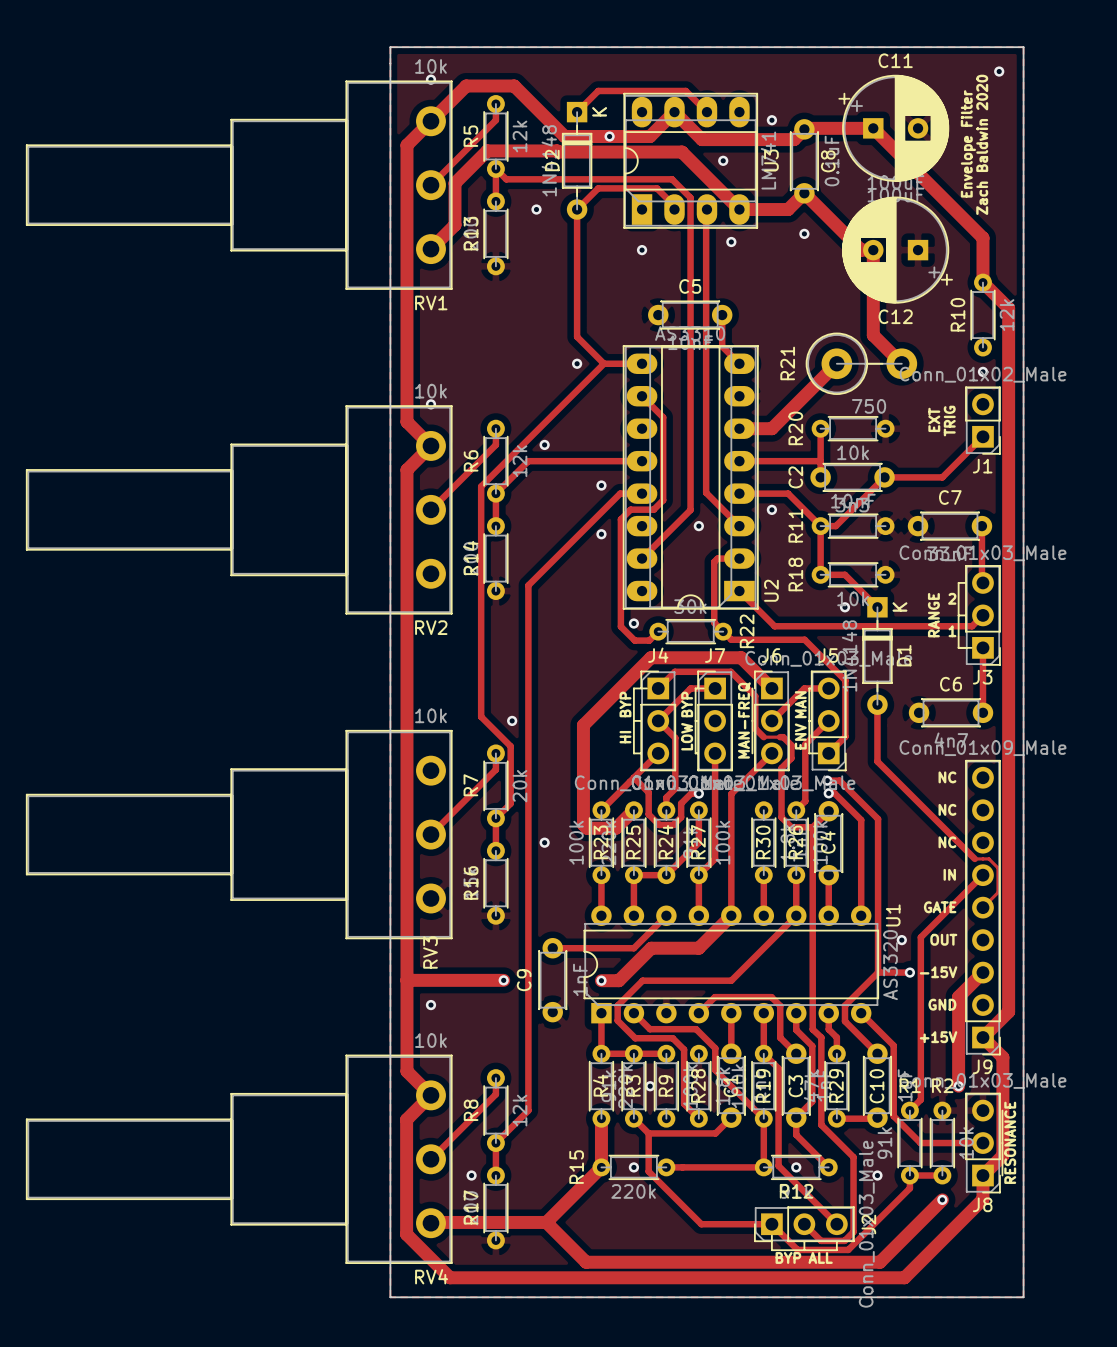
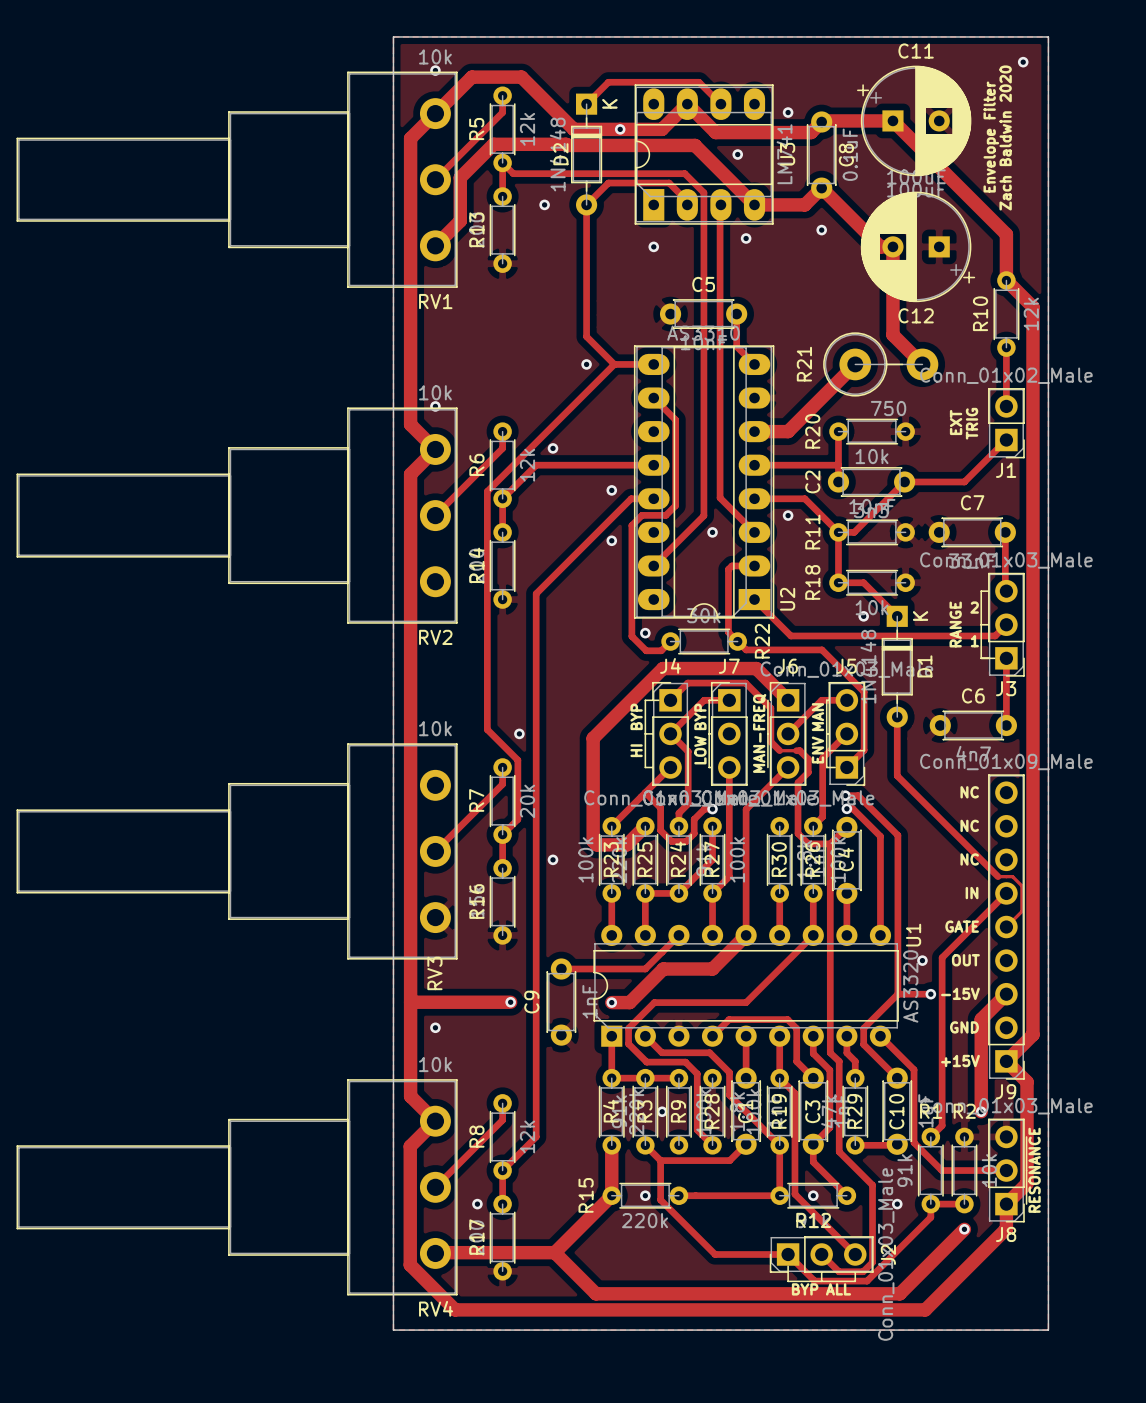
track: none -> (1006, 347) (1006, 406)
via: (982, 371) -> none

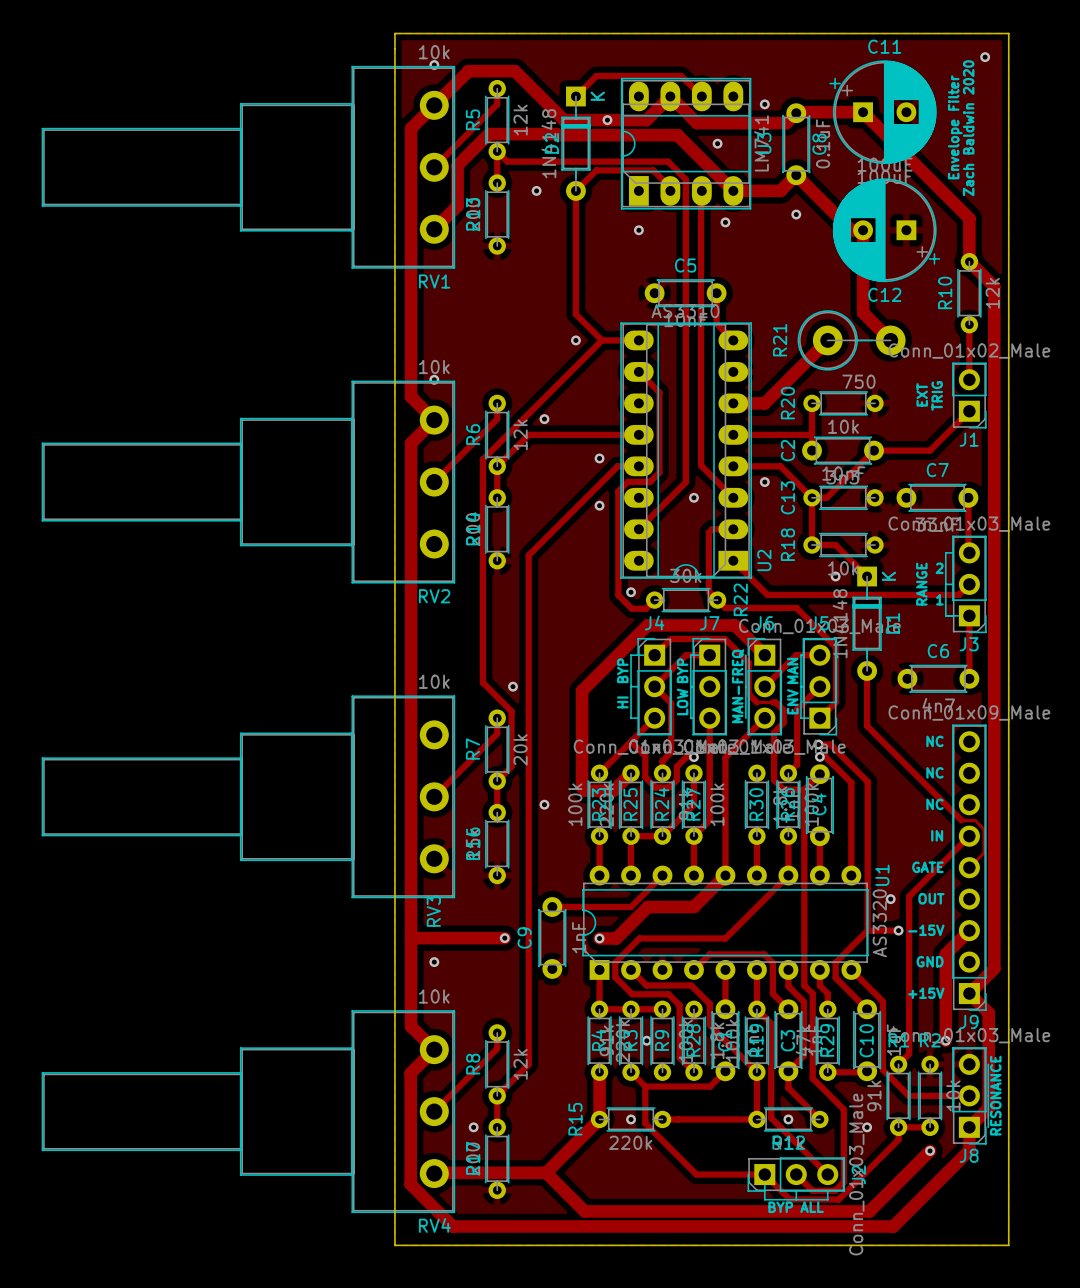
R11 name: R11 (812, 532) -> C13 (787, 497)

